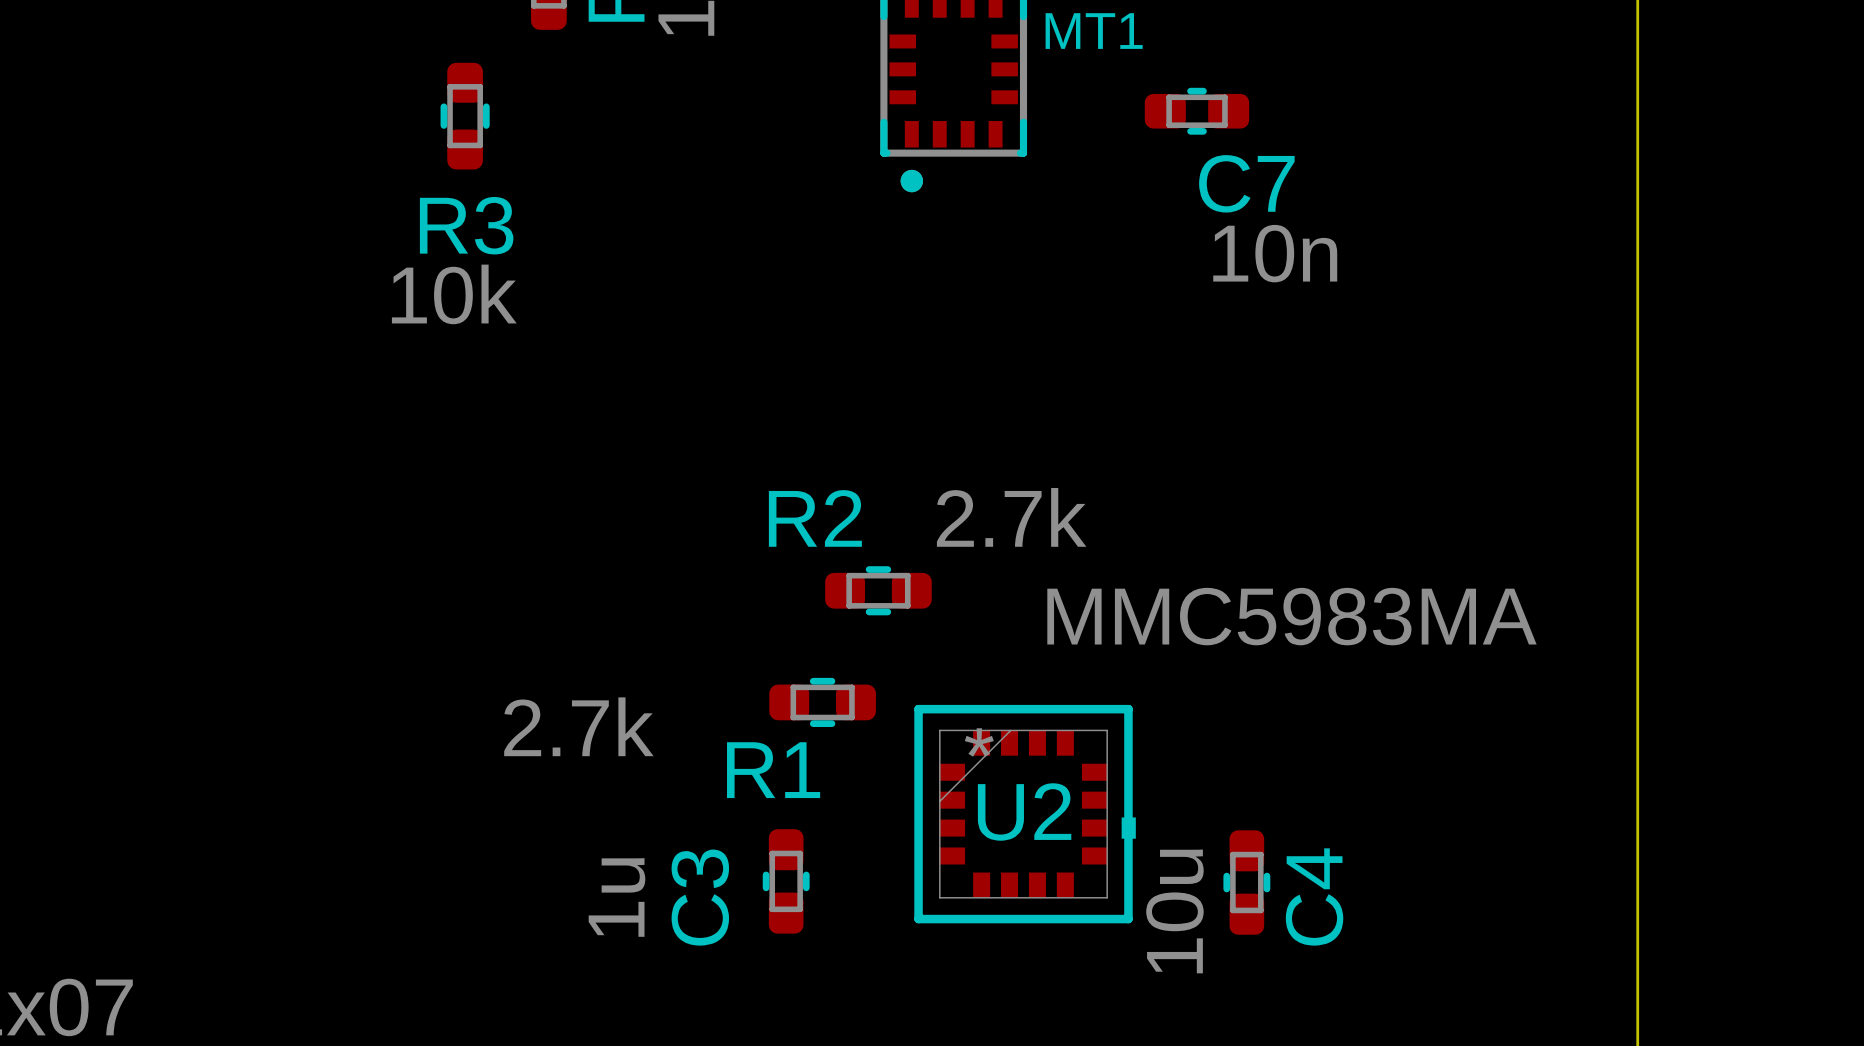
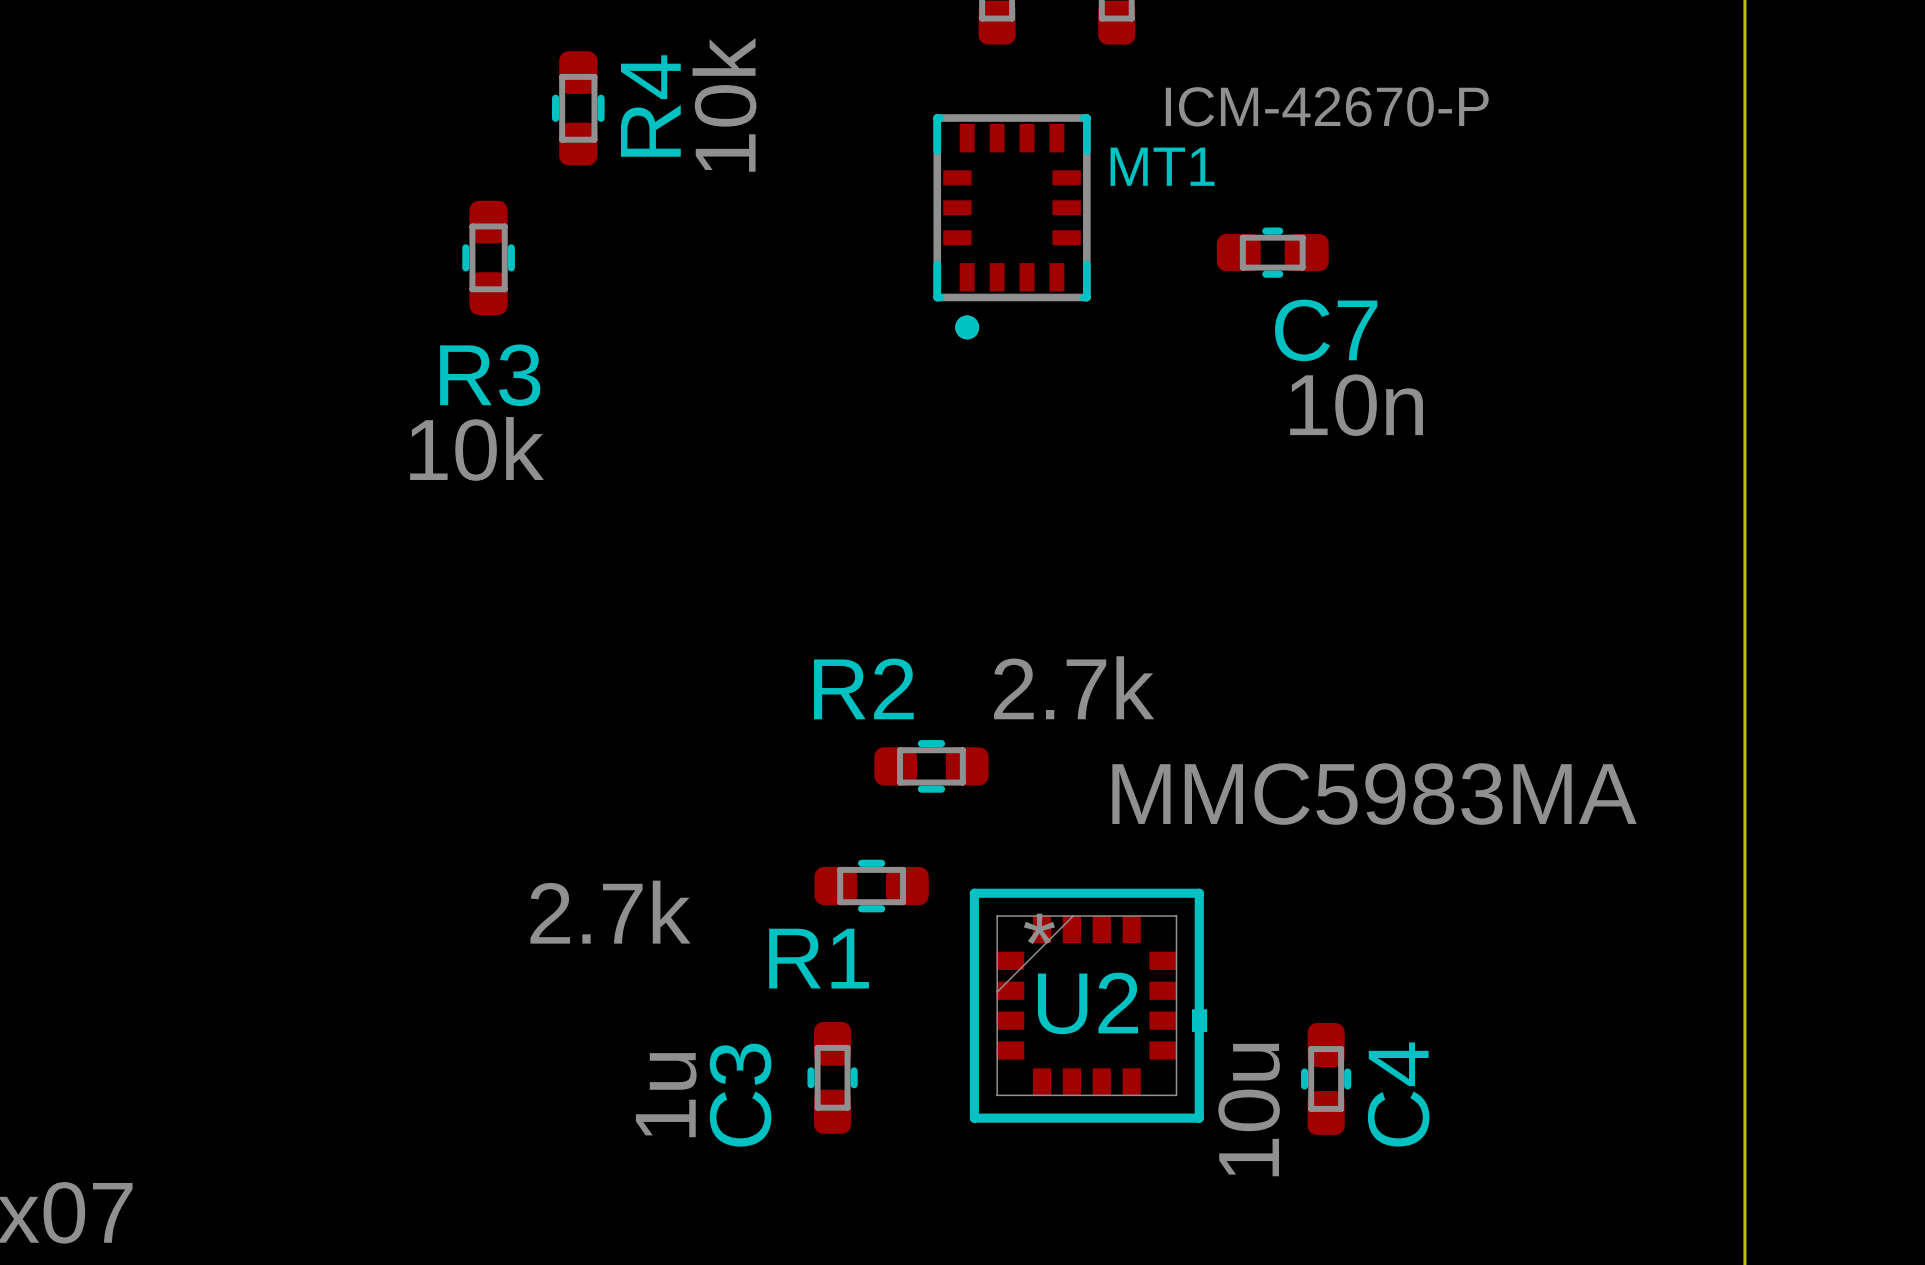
C3 value position: 1u (616, 897) -> 1u (666, 1095)

